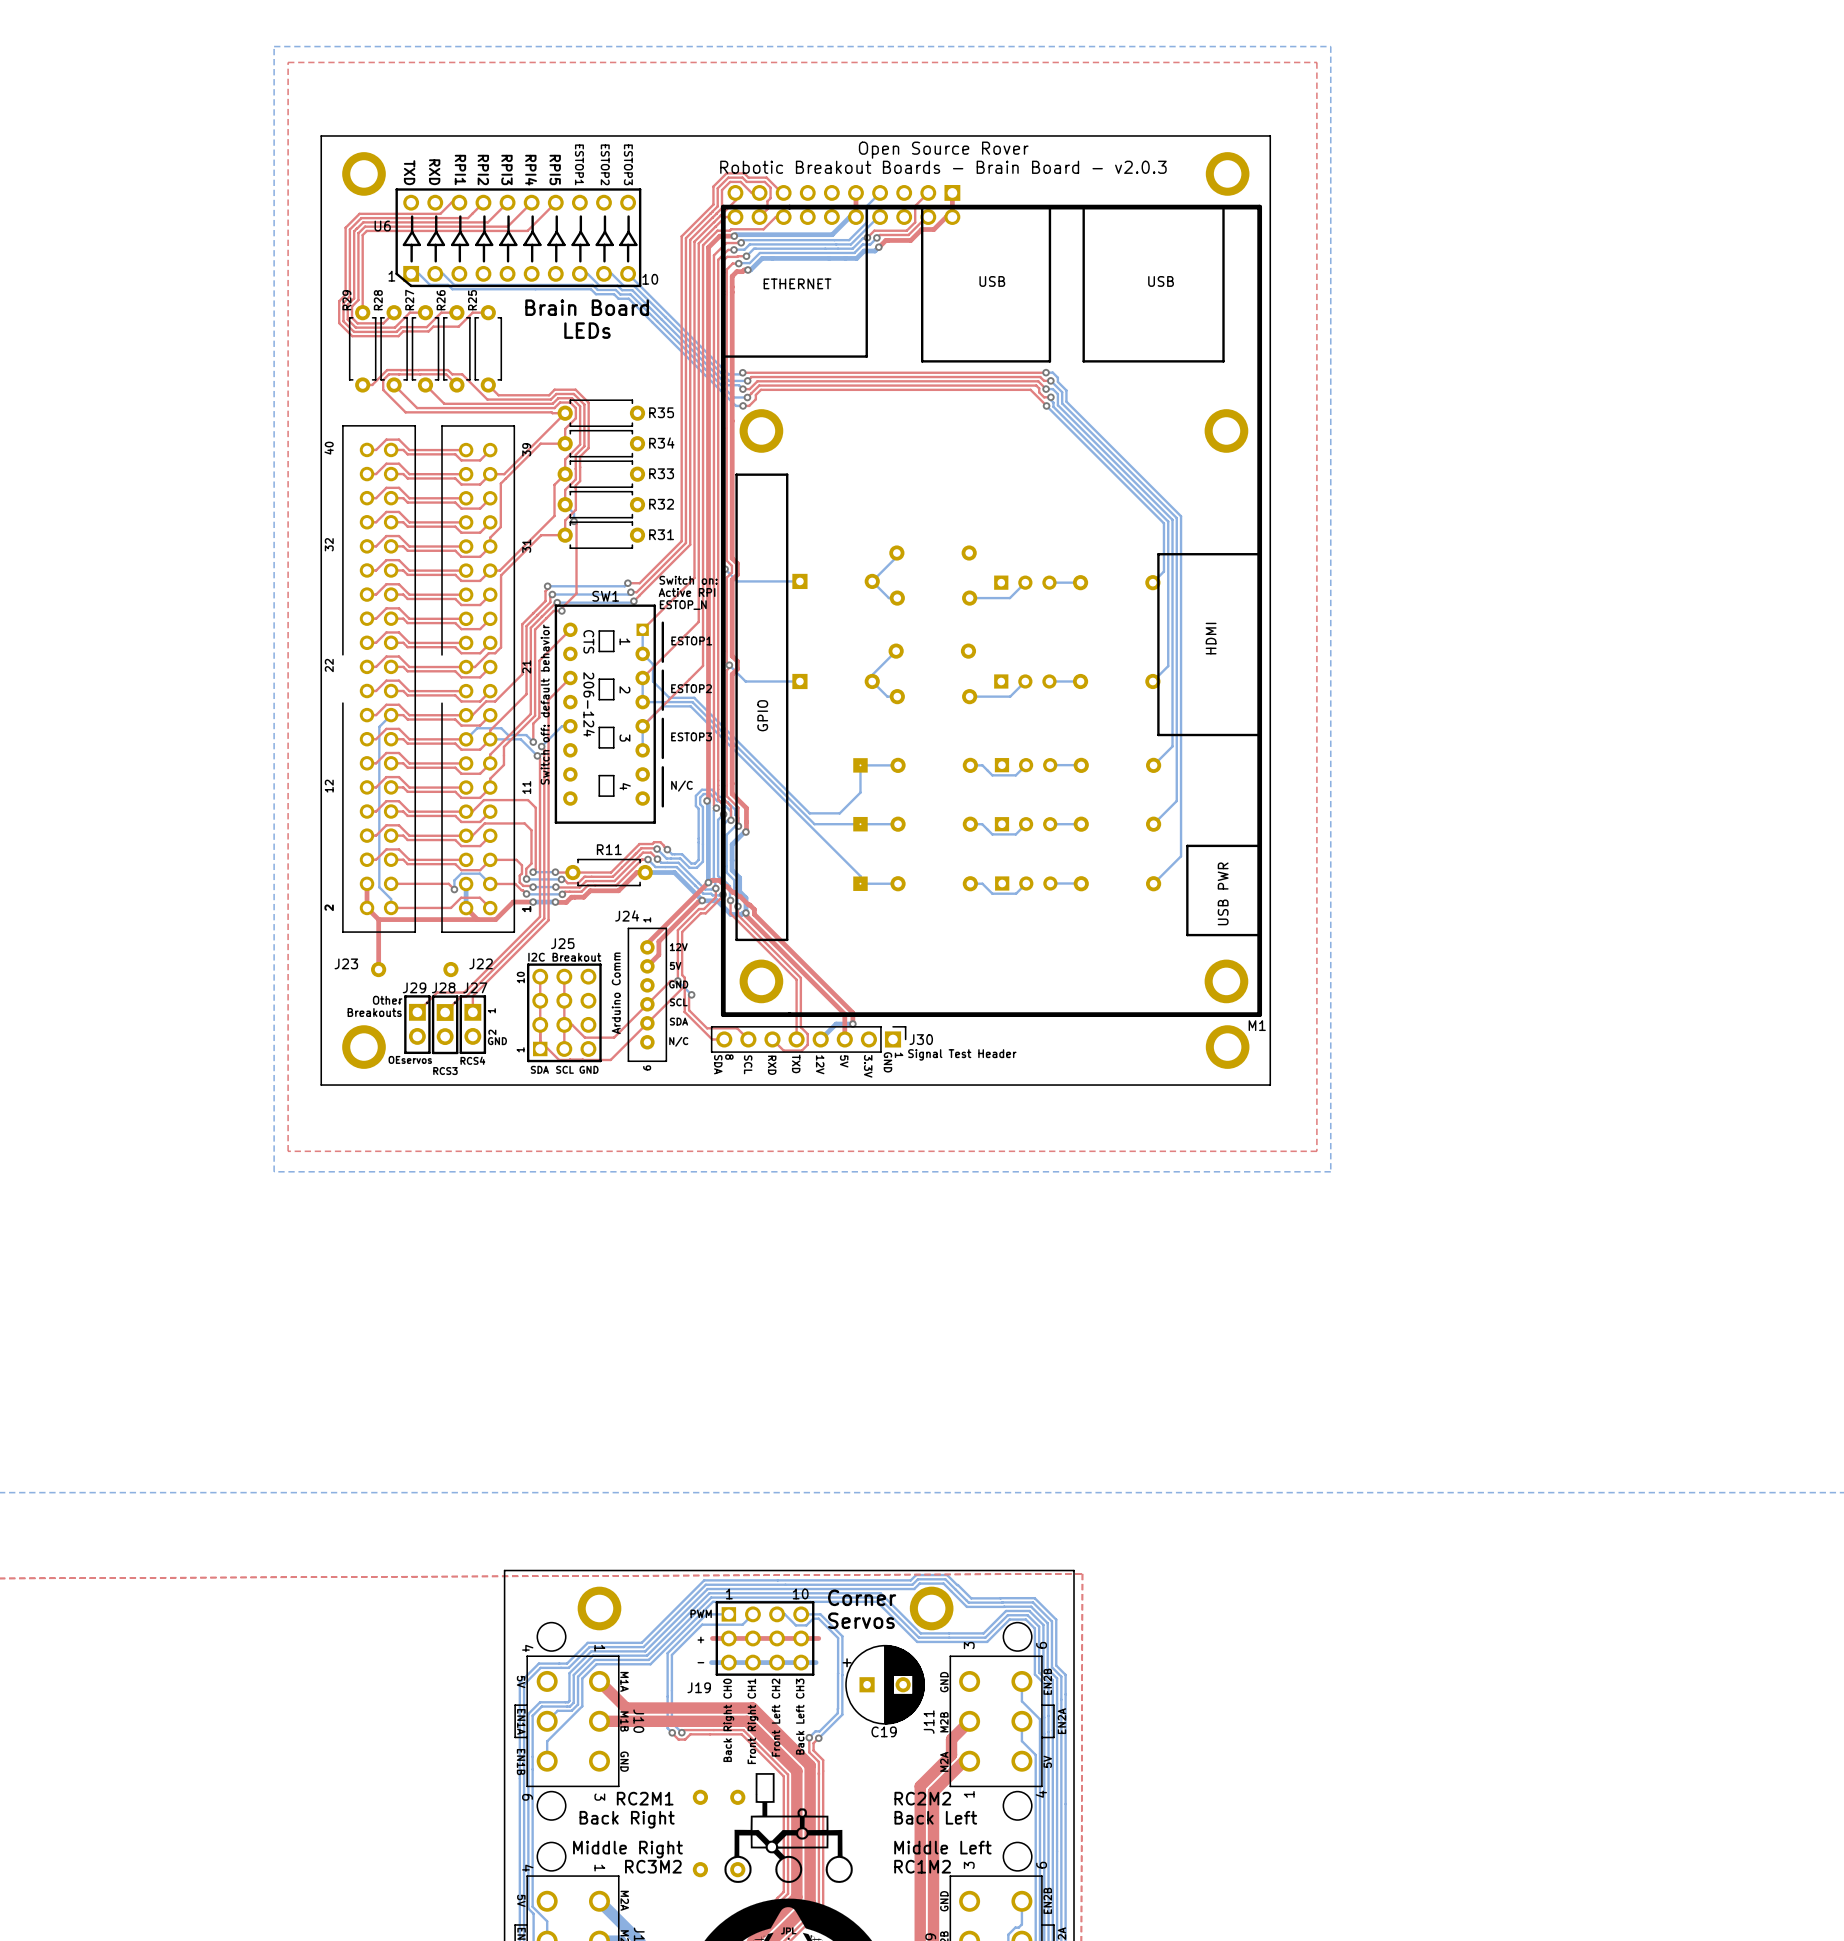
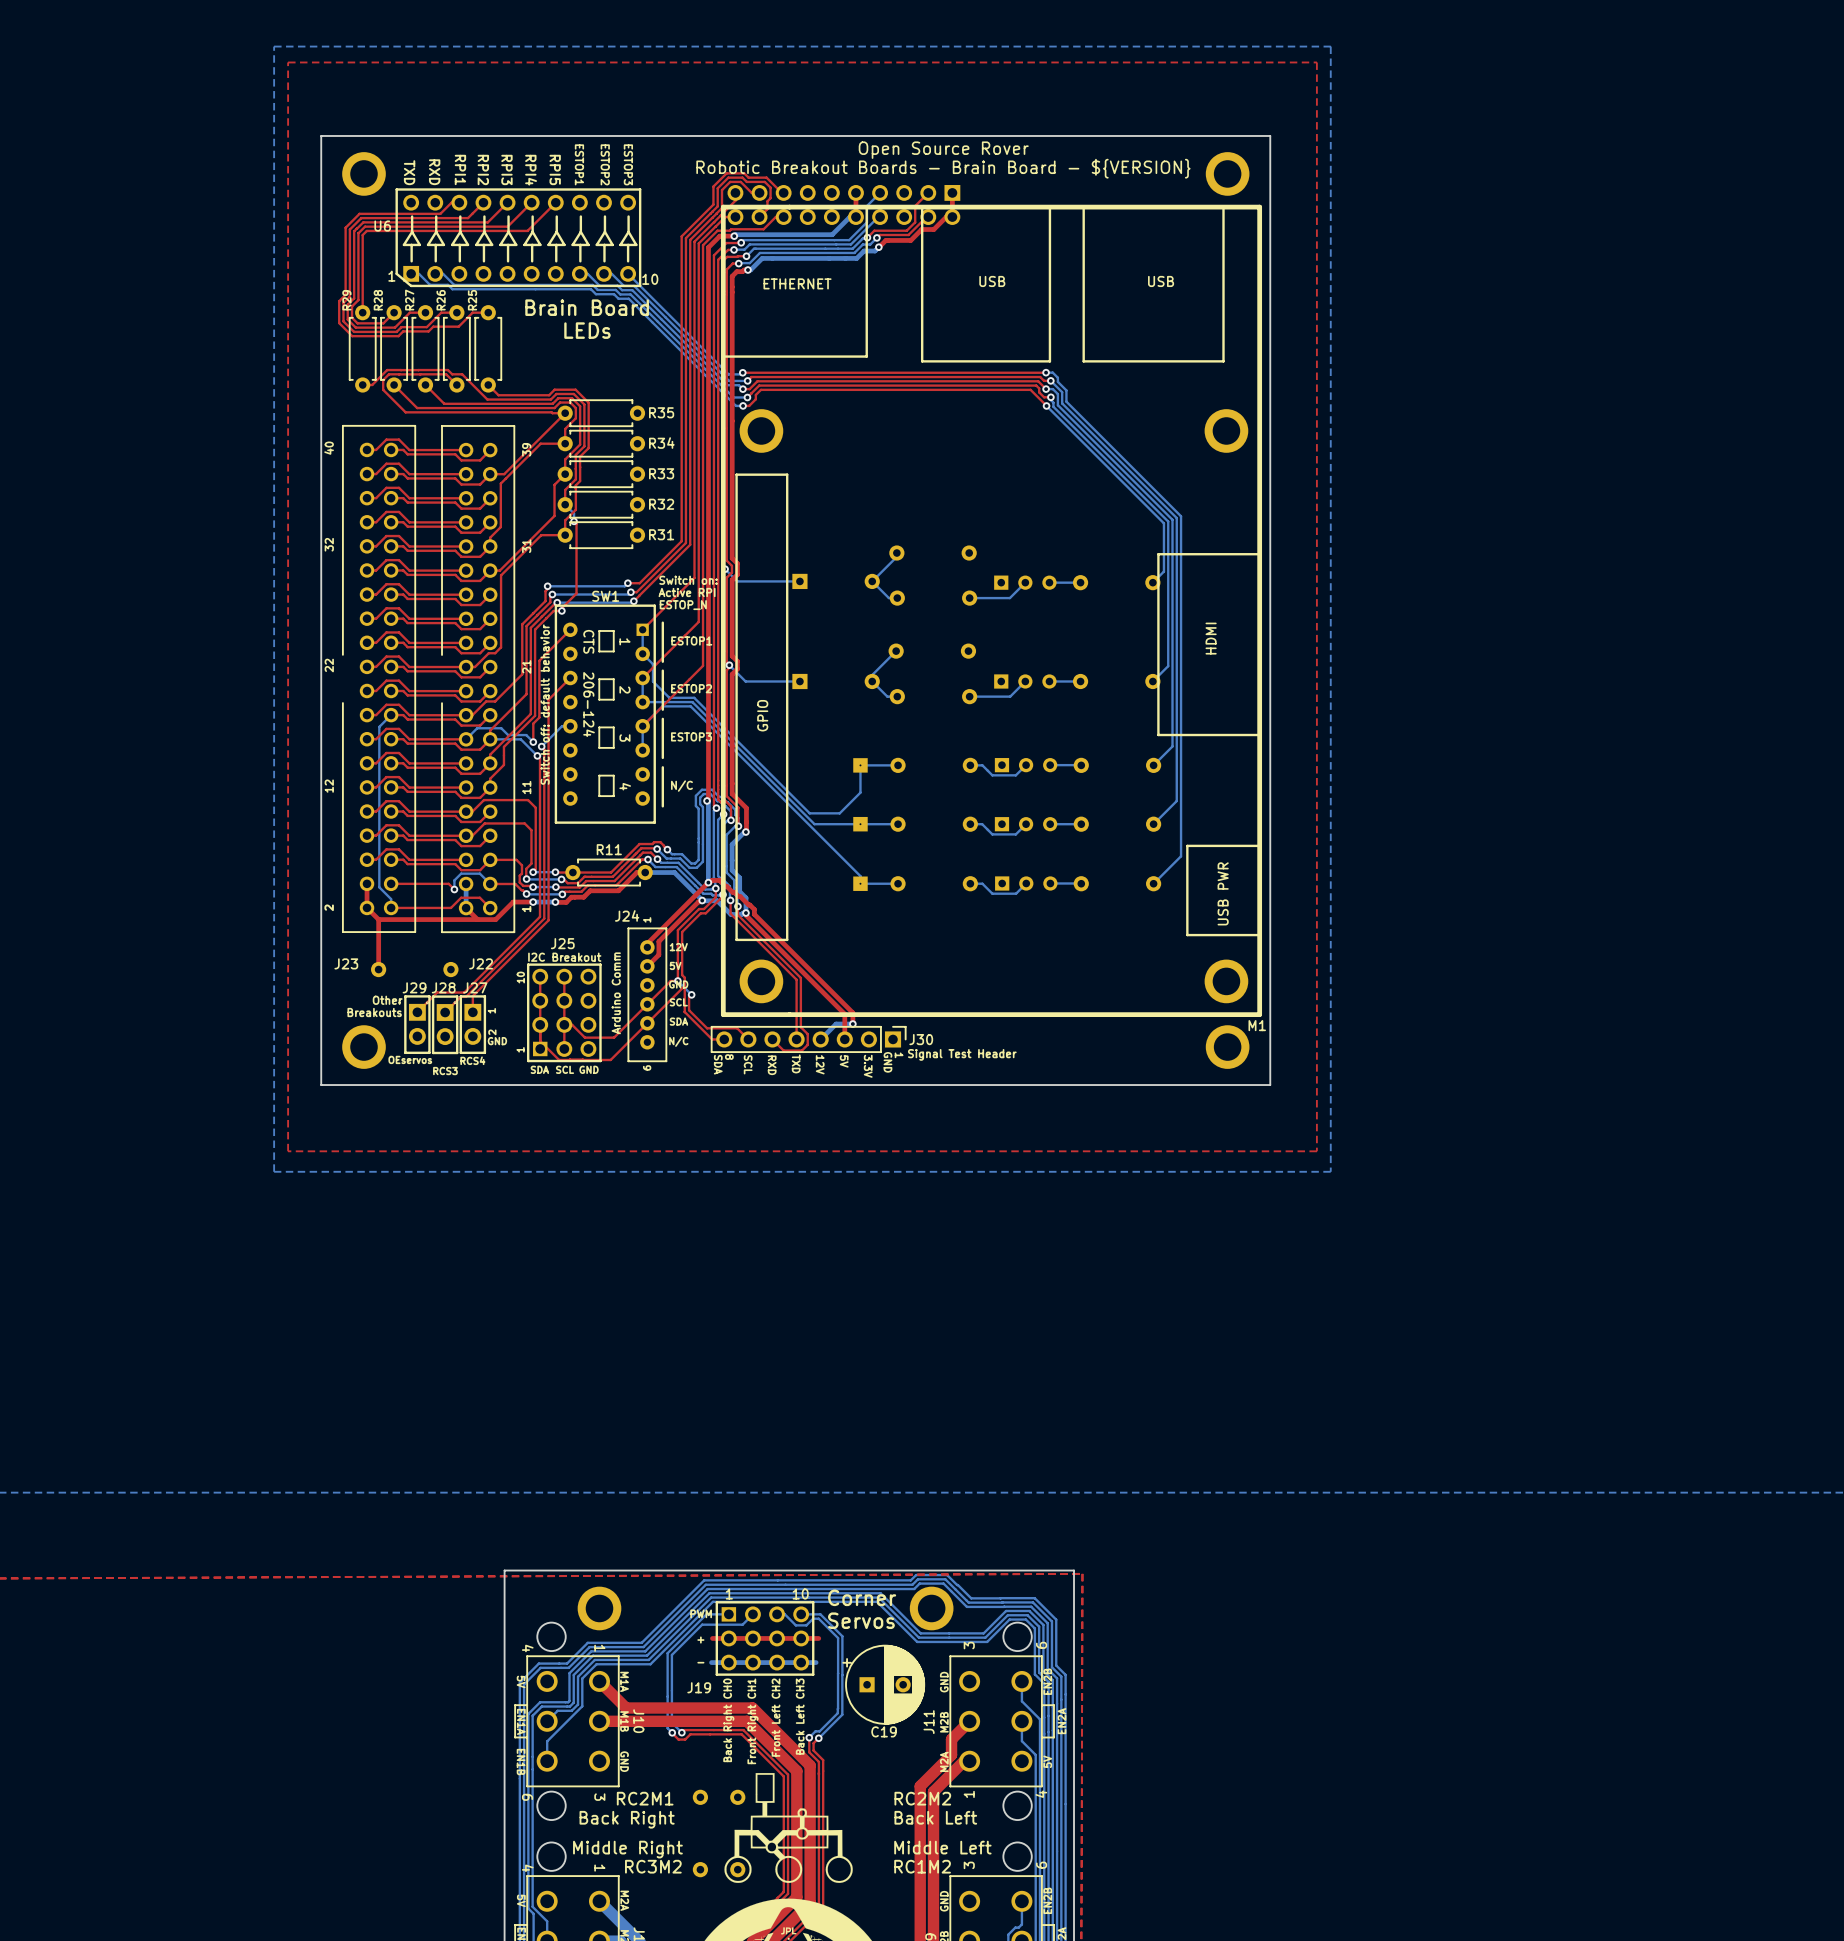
text: Robotic Breakout Boards - Brain Board - v2.0.3 (943, 167) -> Robotic Breakout Boards - Brain Board - ${VERSION} (943, 168)

